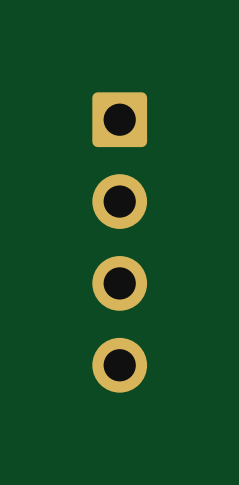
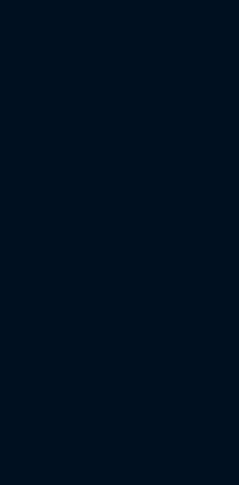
part: (119, 242) -> none

